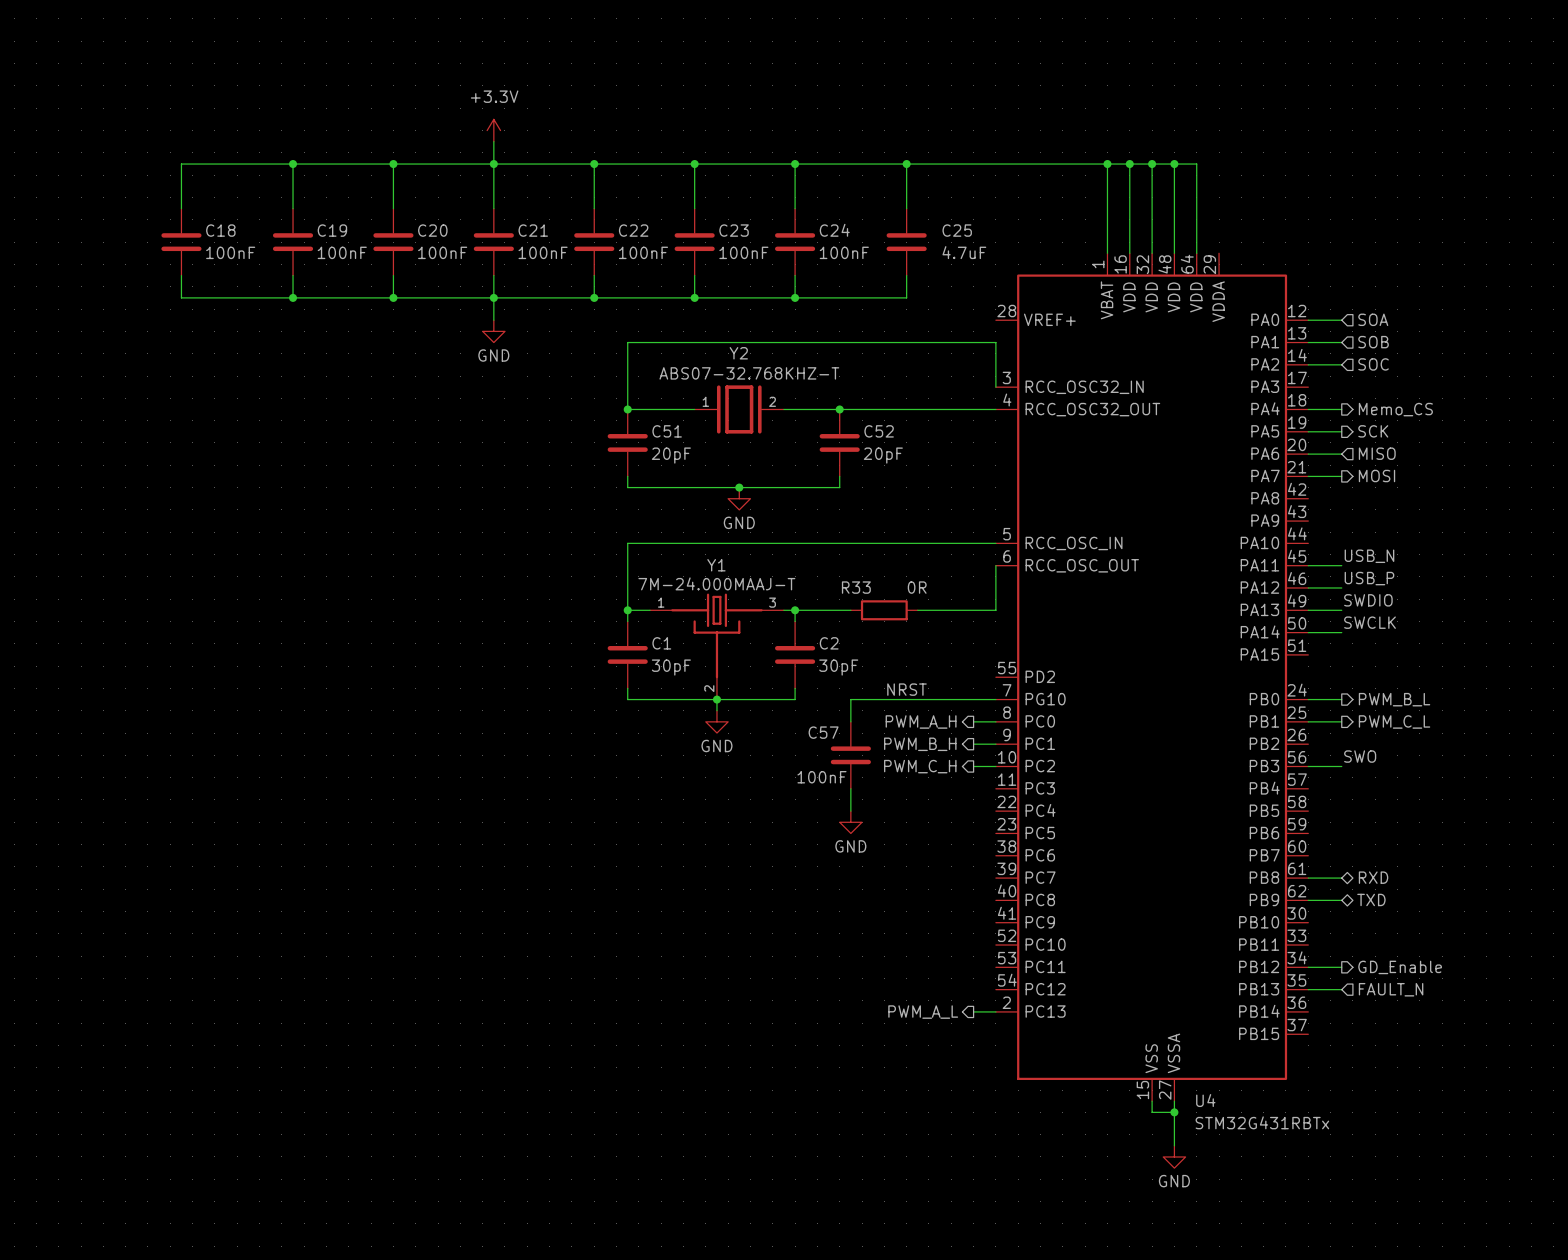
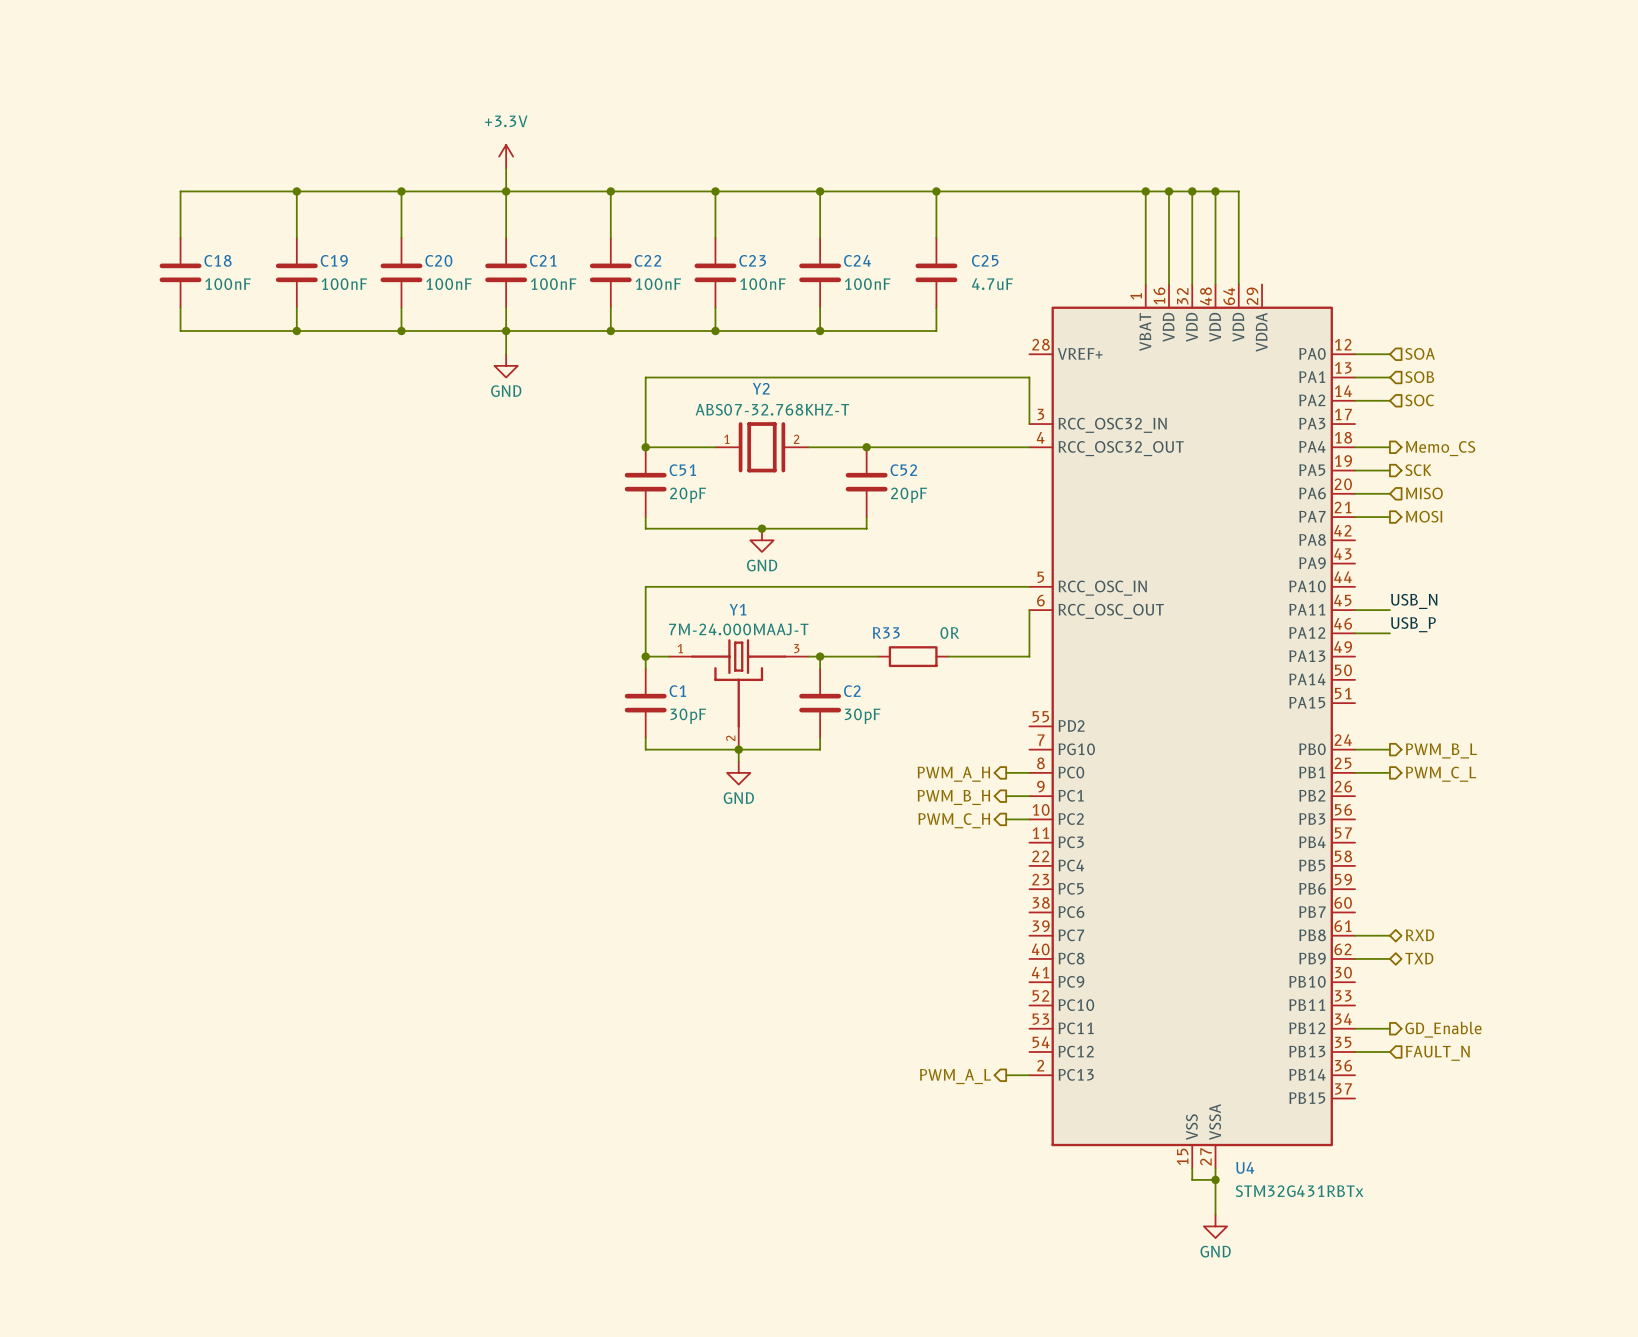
label: SWDIO (1368, 600) -> none
wire: (1308, 610) (1341, 610) -> none
label: SWCLK (1370, 622) -> none
wire: (1308, 632) (1341, 632) -> none
label: NRST (906, 689) -> none
wire: (995, 699) (850, 699) (850, 721) -> none
C57: 100nF (850, 755) -> none
label: SWO (1360, 756) -> none
wire: (1308, 766) (1341, 766) -> none
wire: (850, 788) (850, 811) -> none
power symbol: GND (850, 822) -> none

